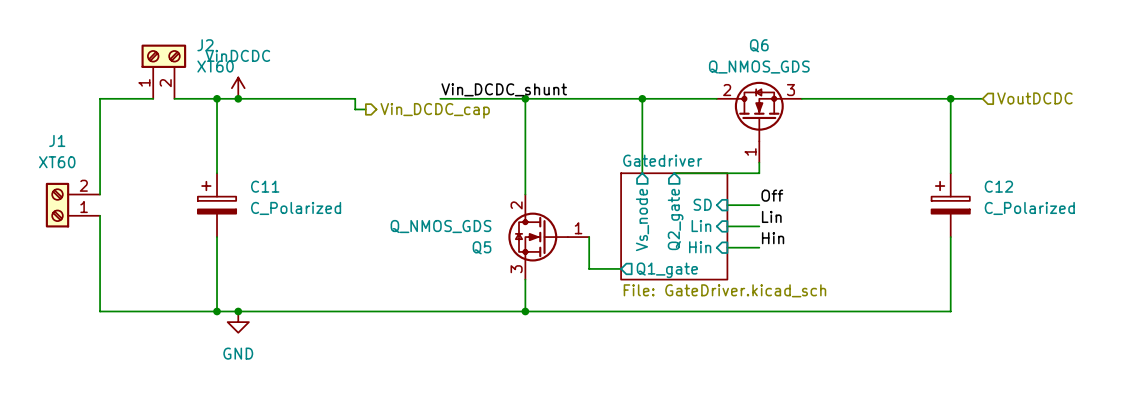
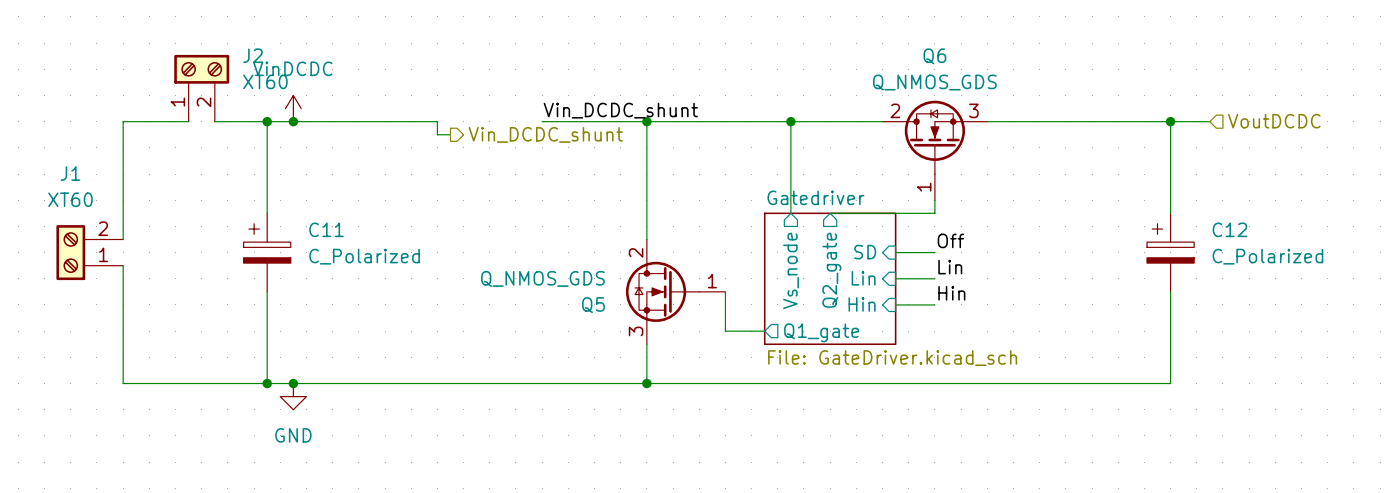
hierarchical label: Vin_DCDC_cap (435, 110) -> Vin_DCDC_shunt (545, 134)

